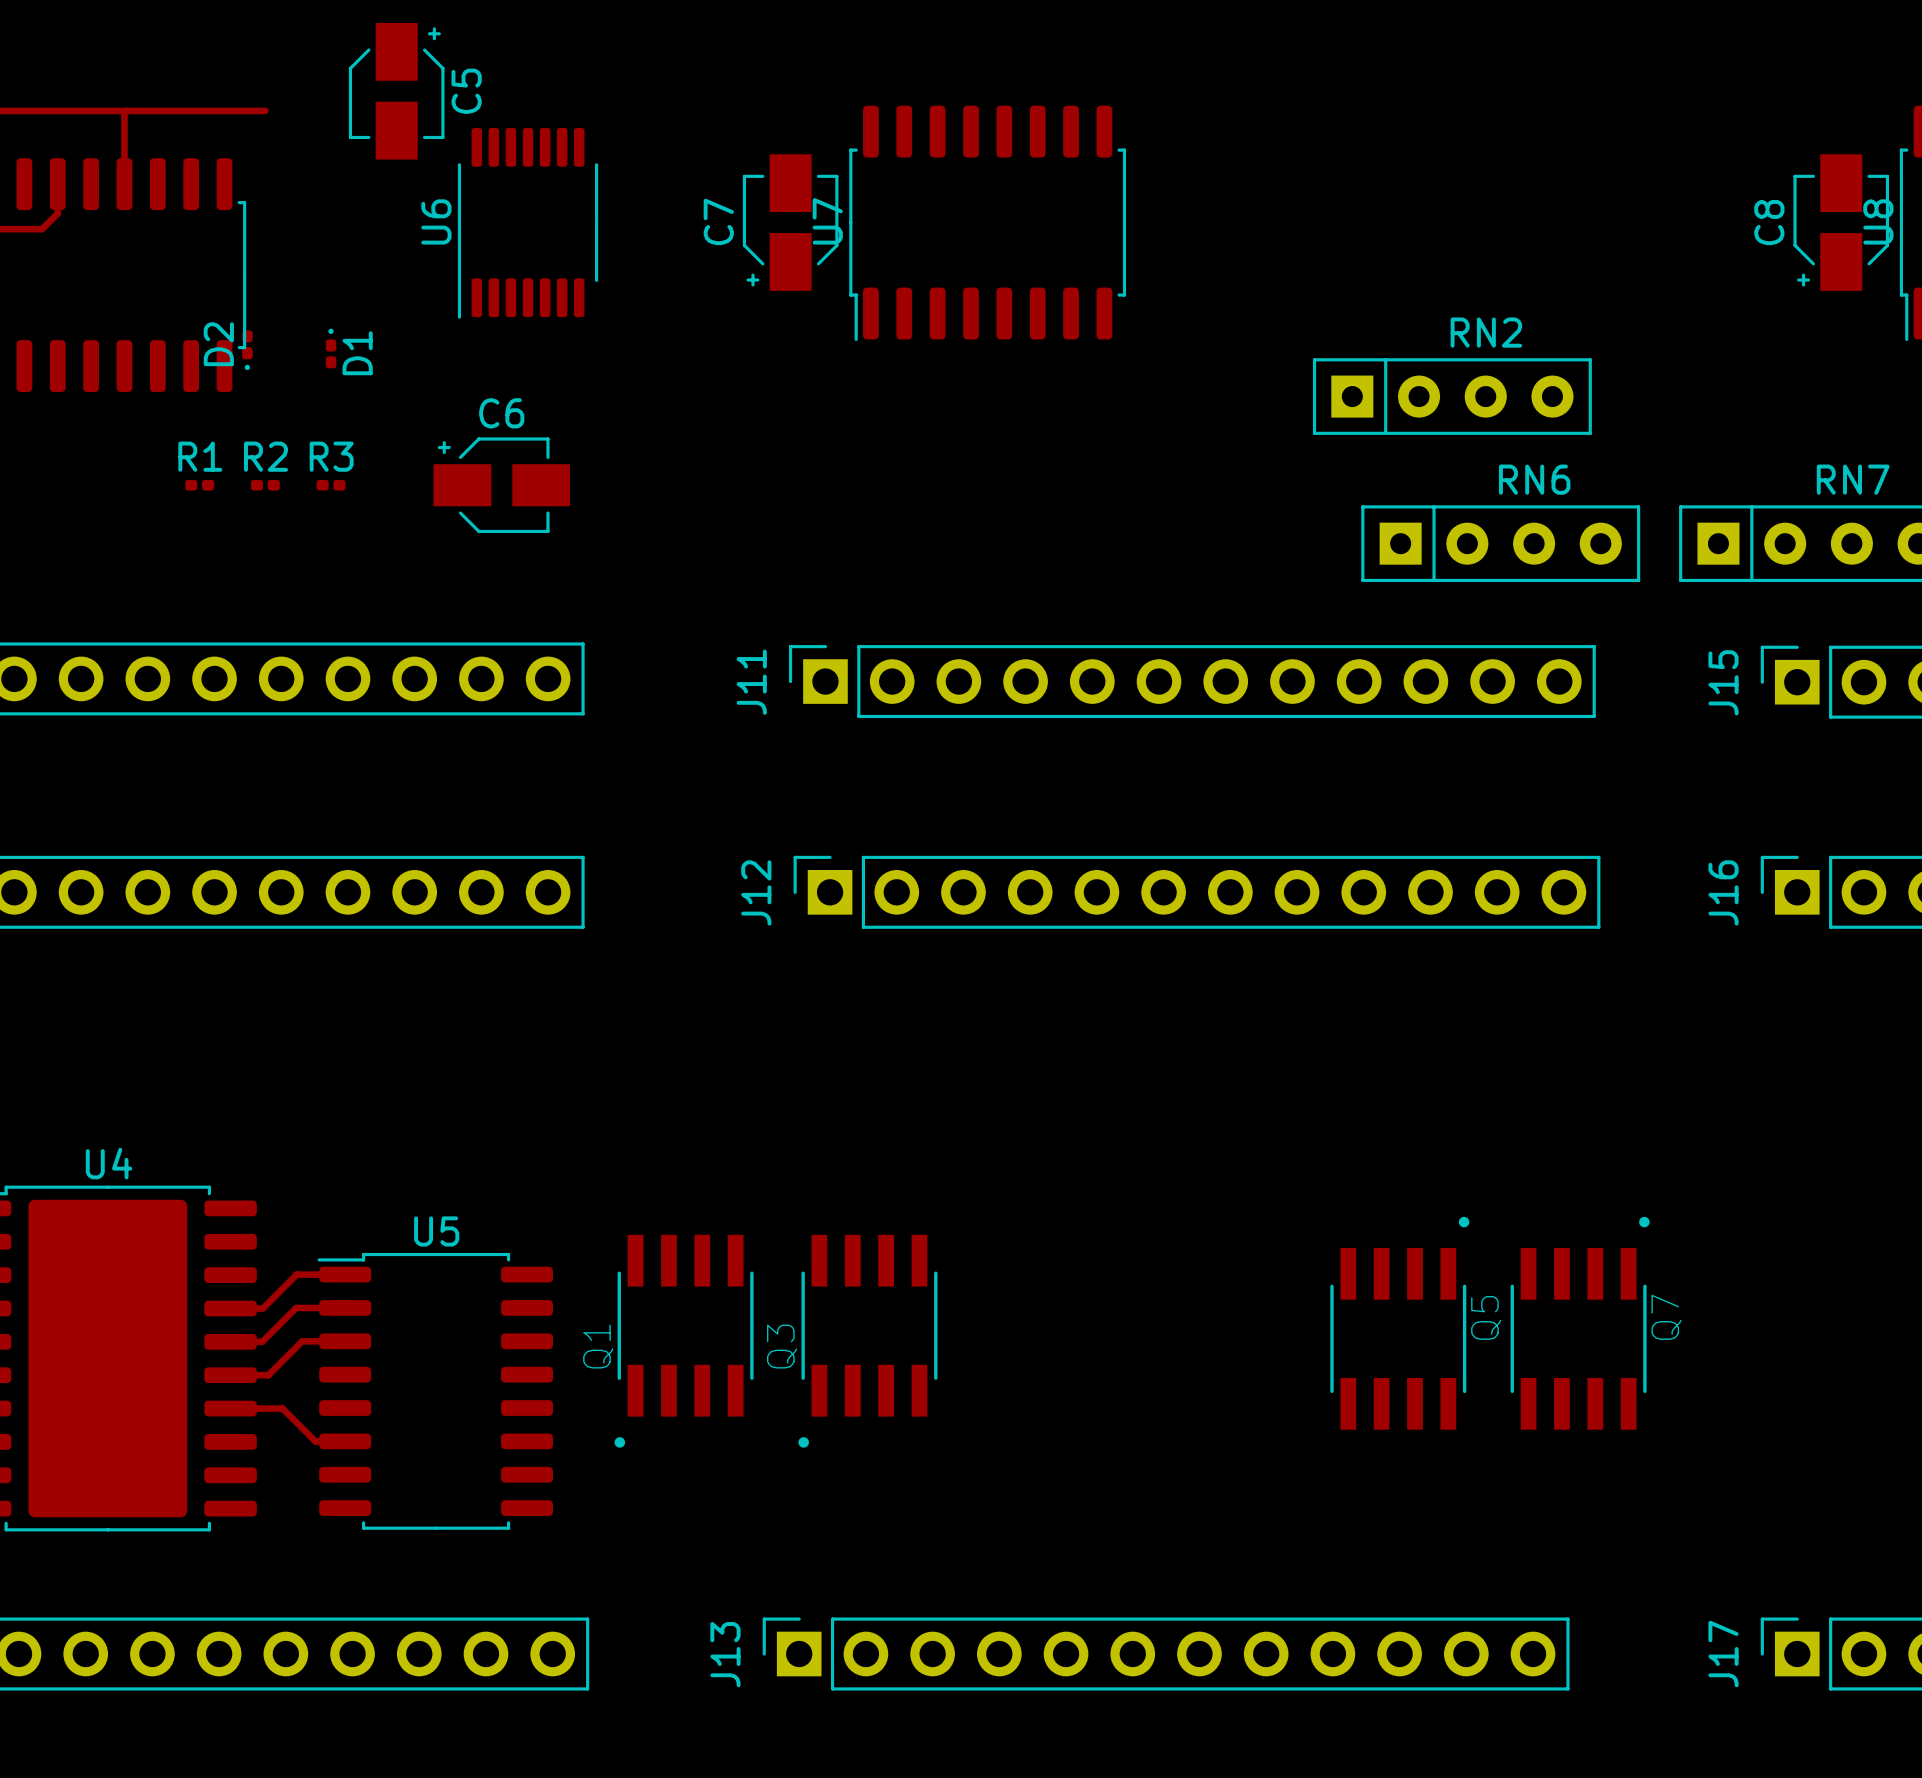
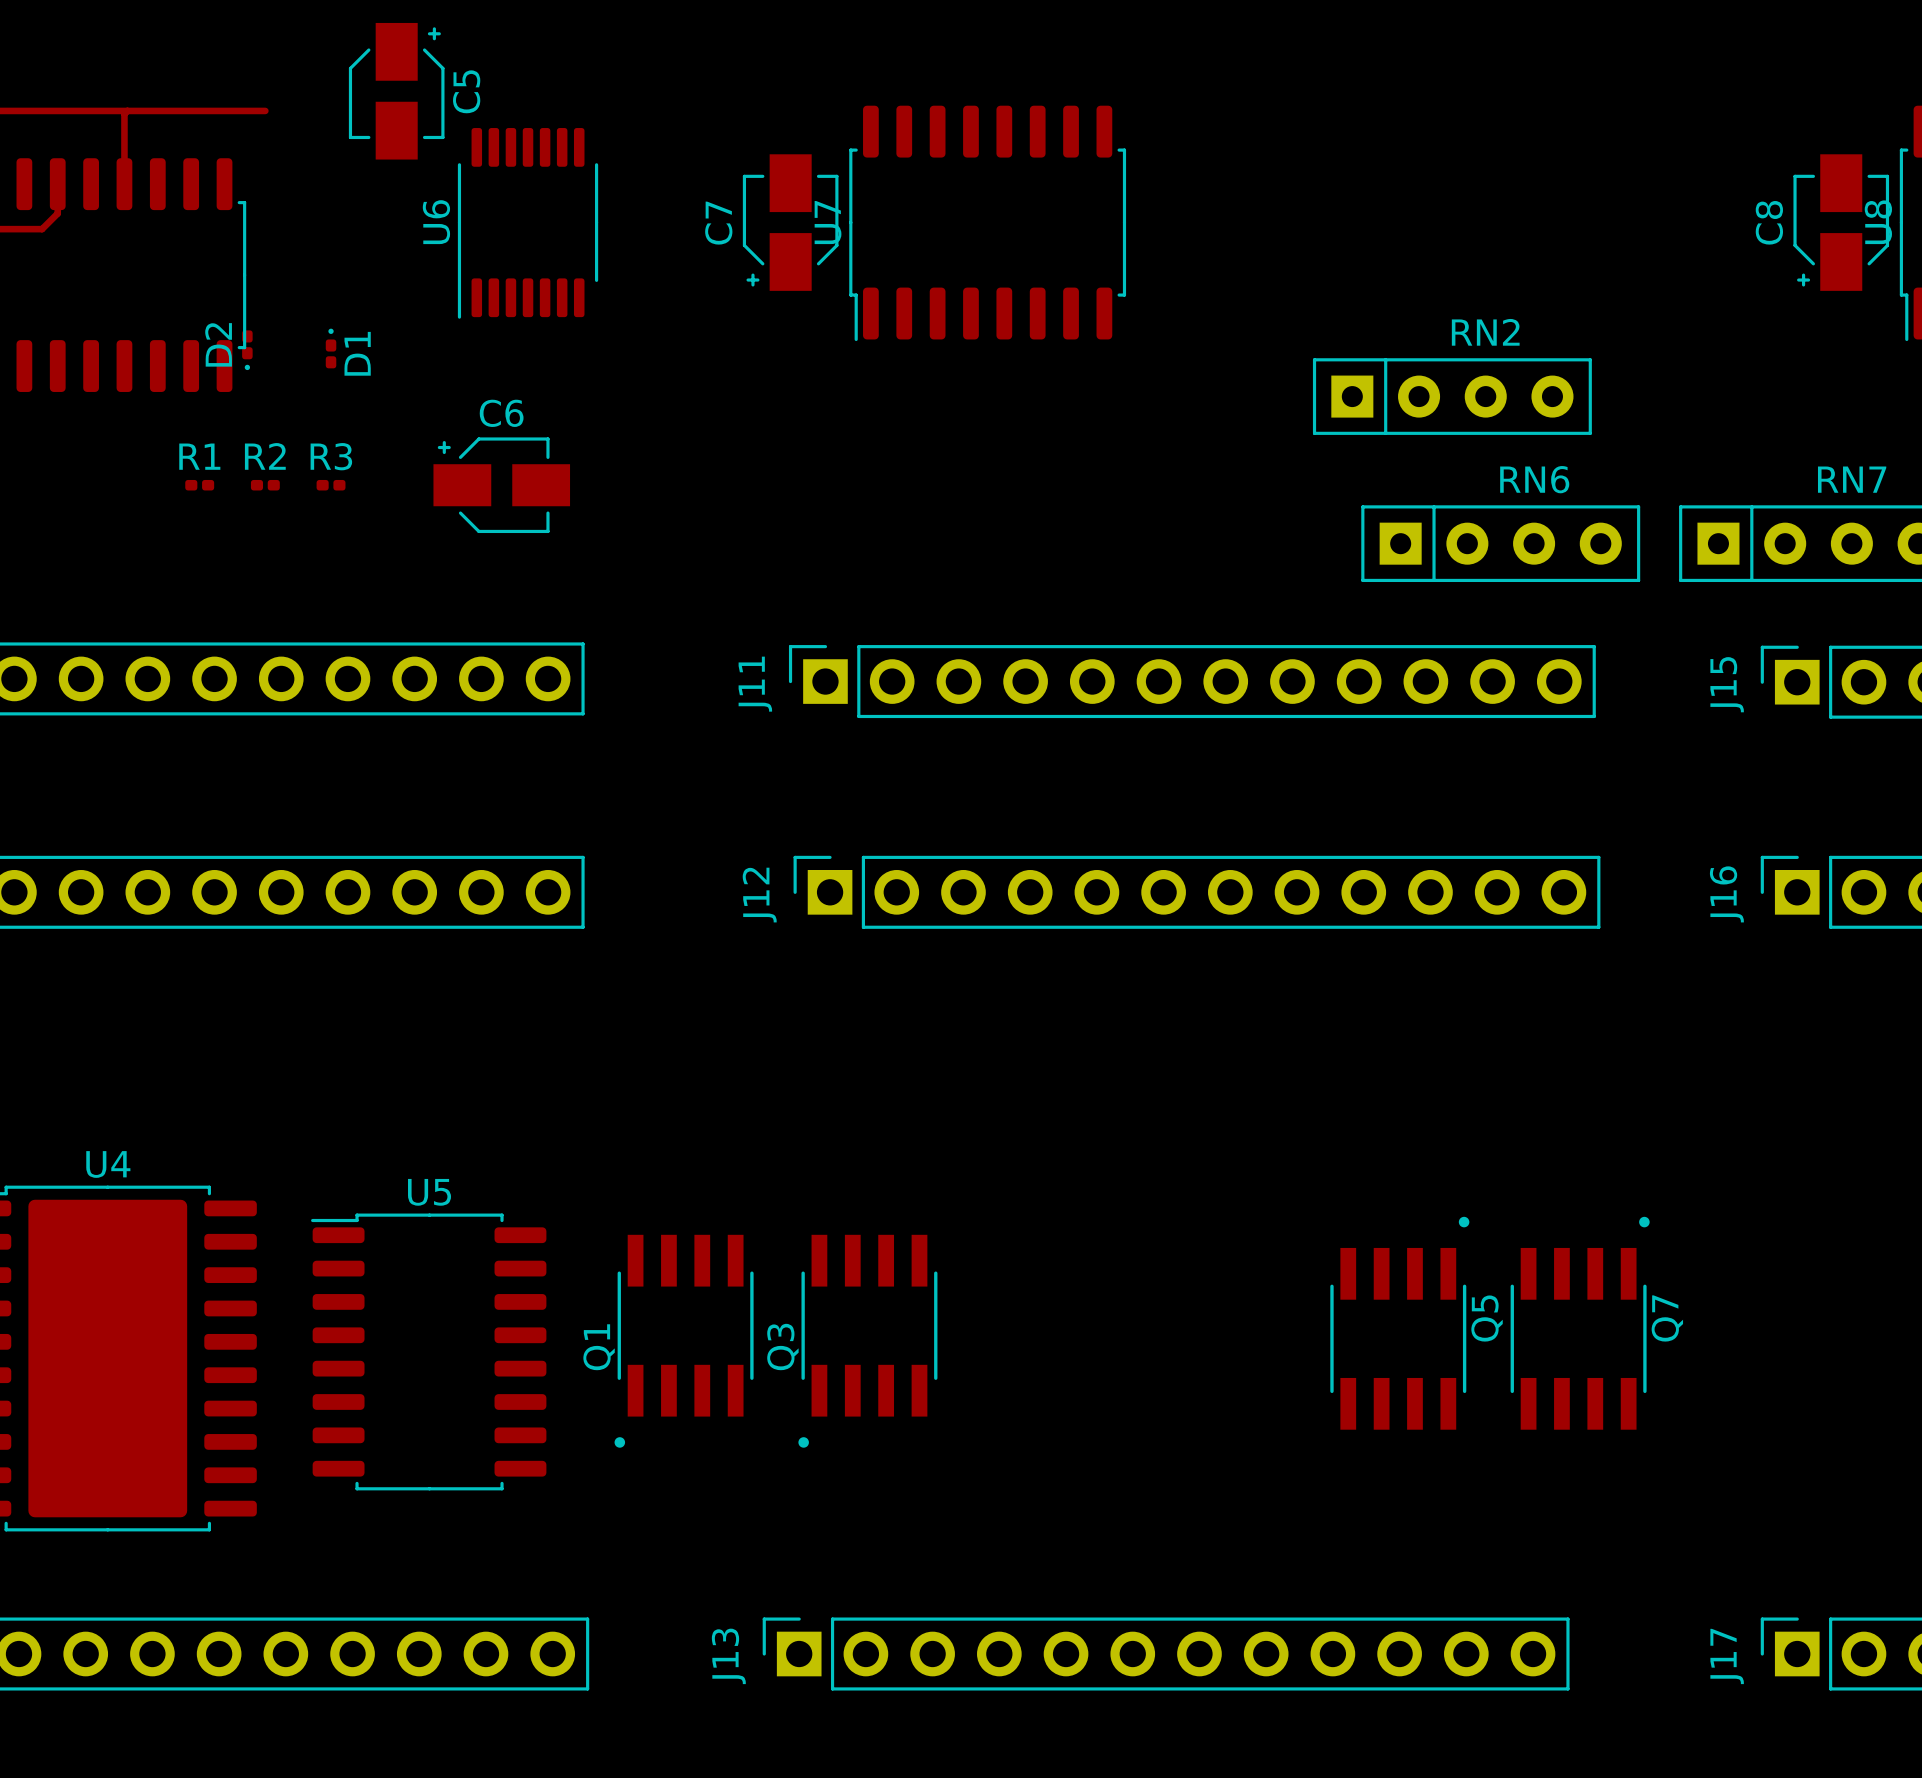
top track: (345, 1274) (296, 1274) (262, 1308) (230, 1308) -> none
top track: (345, 1307) (296, 1307) (262, 1341) (230, 1341) -> none
top track: (345, 1341) (302, 1341) (268, 1375) (230, 1375) -> none
U5 position: (435, 1391) -> (428, 1351)
top track: (230, 1408) (282, 1408) (315, 1441) (345, 1441) -> none

